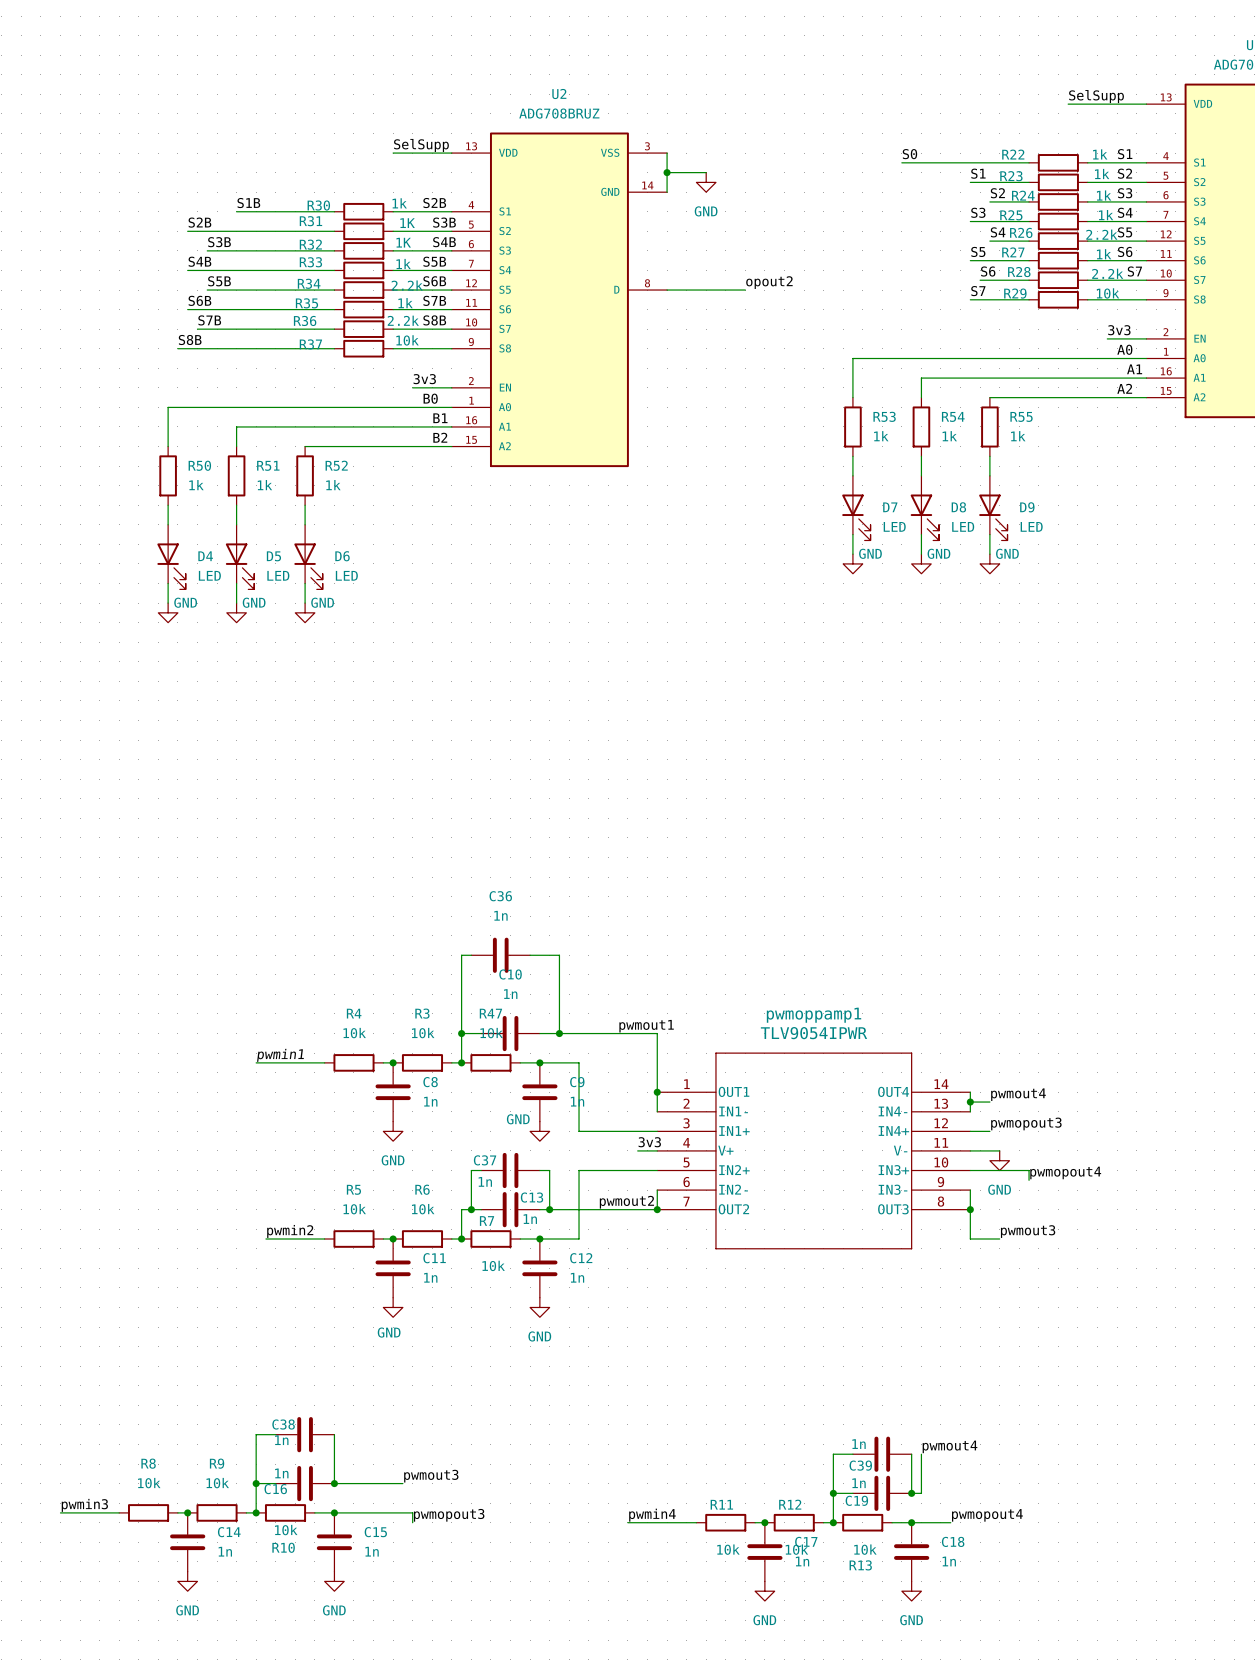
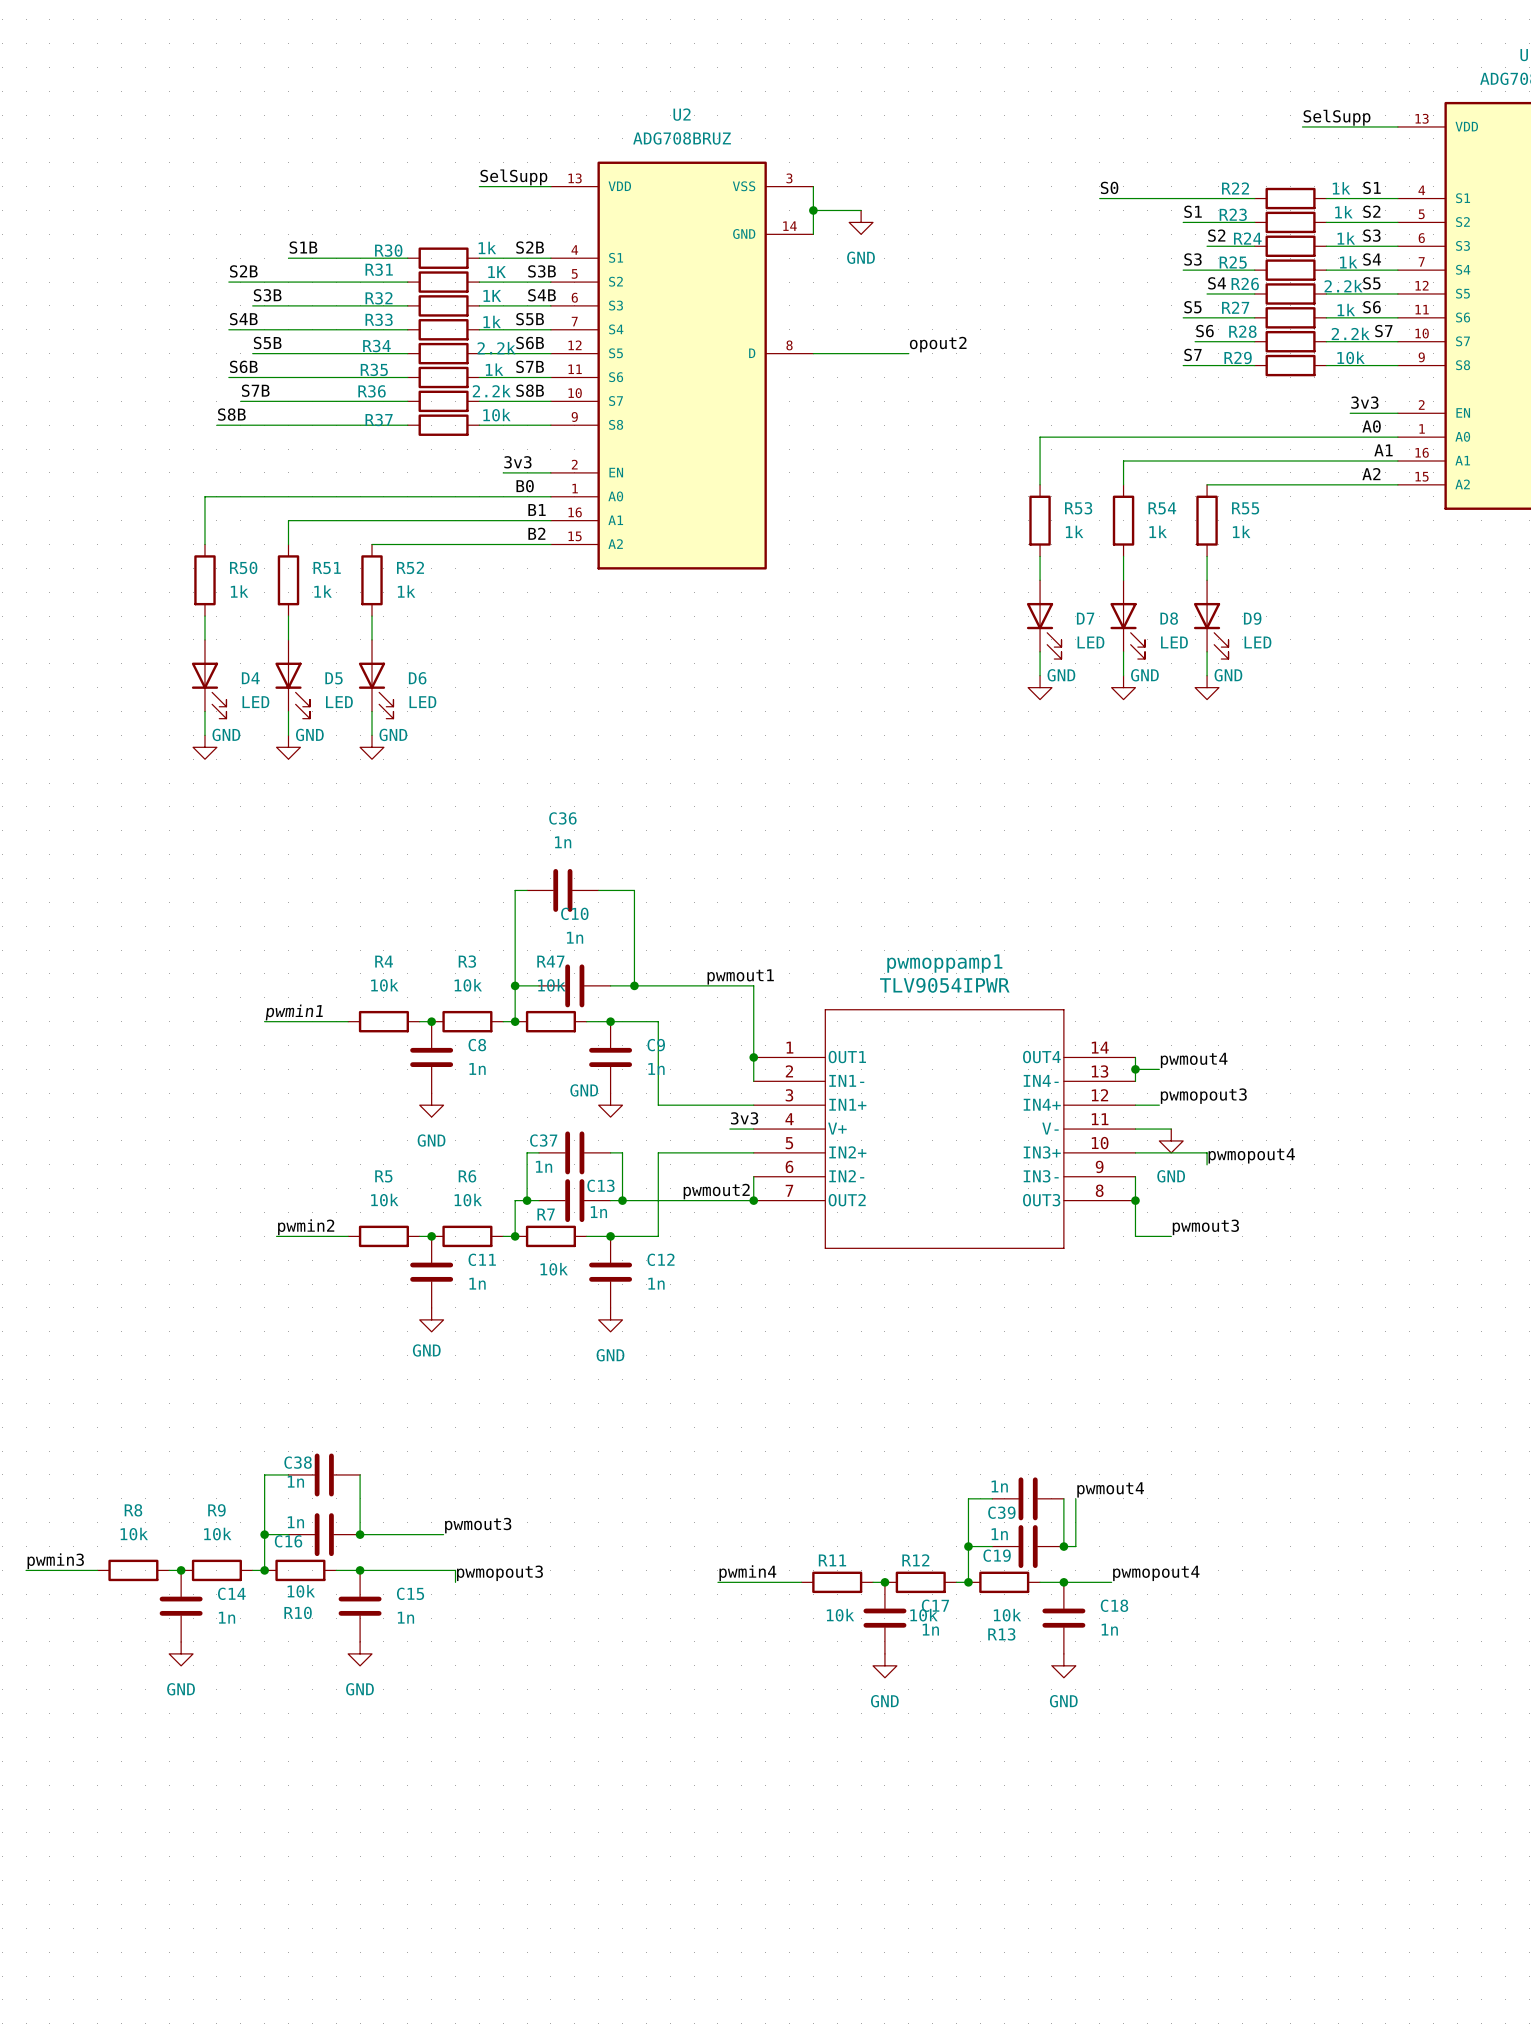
wire: none -> (527, 890) (515, 890) (515, 1021) (503, 1021)
wire: none -> (598, 890) (634, 890) (634, 985)
label: none -> pwmout1 (740, 976)
wire: none -> (515, 985) (539, 985)
junction: none -> (515, 985)
wire: none -> (610, 985) (753, 985) (753, 1081)
junction: none -> (634, 985)
label: none -> pwmin1 (294, 1012)
wire: none -> (264, 1021) (348, 1021)
wire: none -> (419, 1021) (431, 1021)
junction: none -> (431, 1021)
junction: none -> (515, 1021)
wire: none -> (586, 1021) (658, 1021) (658, 1105) (753, 1105)
junction: none -> (610, 1021)
junction: none -> (753, 1057)
wire: none -> (1135, 1057) (1135, 1081)
label: none -> pwmout4 (1194, 1060)
wire: none -> (1135, 1069) (1159, 1069)
junction: none -> (1135, 1069)
label: none -> pwmopout3 (1203, 1096)
power symbol: none -> GND (431, 1105)
power symbol: none -> GND (610, 1105)
wire: none -> (1135, 1105) (1159, 1105)
label: none -> 3v3 (744, 1118)
wire: none -> (1135, 1129) (1171, 1129)
power symbol: none -> GND (1171, 1140)
wire: none -> (539, 1152) (527, 1152) (527, 1200)
wire: none -> (610, 1152) (622, 1152) (622, 1200)
wire: none -> (753, 1152) (658, 1152) (658, 1236) (586, 1236)
wire: none -> (1135, 1152) (1207, 1152) (1207, 1164)
label: none -> pwmopout4 (1251, 1155)
wire: (471, 955) (461, 955) (461, 1062) (451, 1062) -> none
C36 position: (500, 955) -> (562, 890)
wire: (530, 955) (559, 955) (559, 1033) -> none
wire: none -> (753, 1176) (753, 1200) (610, 1200)
wire: none -> (1135, 1176) (1135, 1236) (1171, 1236)
label: none -> pwmout2 (716, 1191)
junction: none -> (527, 1200)
wire: none -> (539, 1200) (515, 1200) (515, 1236) (503, 1236)
junction: none -> (622, 1200)
junction: none -> (753, 1200)
junction: none -> (1135, 1200)
label: none -> pwmin2 (306, 1227)
label: none -> pwmout3 (1205, 1227)
wire: none -> (276, 1236) (348, 1236)
junction: none -> (431, 1236)
junction: none -> (515, 1236)
junction: none -> (610, 1236)
label: pwmout1 (646, 1026) -> none
wire: (461, 1033) (481, 1033) -> (729, 1129) (753, 1129)
junction: (461, 1033) -> none
C10 position: (510, 1033) -> (574, 985)
wire: (539, 1033) (657, 1033) (657, 1111) -> none
junction: (559, 1033) -> none
label: pwmin1 (280, 1055) -> none
wire: (256, 1062) (324, 1062) -> none
R4 position: (353, 1062) -> (383, 1021)
wire: (383, 1062) (393, 1062) -> (419, 1236) (431, 1236)
junction: (393, 1062) -> none
R3 position: (422, 1062) -> (467, 1021)
junction: (461, 1062) -> none
R47 position: (490, 1062) -> (550, 1021)
wire: (520, 1062) (579, 1062) (579, 1131) (657, 1131) -> none
junction: (539, 1062) -> none
power symbol: none -> GND (431, 1319)
power symbol: none -> GND (610, 1319)
C8 position: (393, 1092) -> (431, 1057)
C9 position: (539, 1092) -> (610, 1057)
junction: (657, 1092) -> none
wire: (970, 1092) (970, 1111) -> none
label: pwmout4 (1018, 1094) -> none
wire: (970, 1102) (989, 1102) -> none
junction: (970, 1102) -> none
label: pwmopout3 (1026, 1123) -> none
power symbol: GND (393, 1131) -> none
power symbol: GND (539, 1131) -> none
wire: (970, 1131) (989, 1131) -> none
label: 3v3 (649, 1142) -> none
wire: (637, 1150) (657, 1150) -> none
pwmoppamp1 position: (813, 1150) -> (944, 1129)
wire: (970, 1150) (999, 1150) -> none
power symbol: GND (999, 1160) -> none
wire: (481, 1170) (471, 1170) (471, 1209) -> none
C37 position: (510, 1170) -> (574, 1152)
wire: (539, 1170) (549, 1170) (549, 1209) -> none
wire: (657, 1170) (579, 1170) (579, 1238) (520, 1238) -> none
wire: (970, 1170) (1029, 1170) (1029, 1180) -> none
label: pwmopout4 (1065, 1172) -> none
wire: (657, 1190) (657, 1209) (539, 1209) -> none
wire: (970, 1190) (970, 1238) (999, 1238) -> none
label: pwmout2 (626, 1202) -> none
wire: none -> (288, 1474) (264, 1474) (264, 1570) (252, 1570)
wire: none -> (360, 1474) (360, 1534) (443, 1534)
junction: (471, 1209) -> none
wire: (481, 1209) (461, 1209) (461, 1238) (451, 1238) -> none
C13 position: (510, 1209) -> (574, 1200)
junction: (549, 1209) -> none
junction: (657, 1209) -> none
junction: (970, 1209) -> none
label: none -> pwmout4 (1110, 1489)
wire: none -> (992, 1498) (968, 1498) (968, 1582) (956, 1582)
wire: none -> (1063, 1498) (1063, 1546) (1075, 1546) (1075, 1498)
label: pwmin2 (290, 1231) -> none
label: pwmout3 (1028, 1231) -> none
wire: (265, 1238) (324, 1238) -> none
R5 position: (353, 1238) -> (383, 1236)
wire: (383, 1238) (393, 1238) -> none
junction: (393, 1238) -> none
R6 position: (422, 1238) -> (467, 1236)
junction: (461, 1238) -> none
R7 position: (490, 1238) -> (550, 1236)
junction: (539, 1238) -> none
label: none -> pwmout3 (478, 1525)
wire: none -> (264, 1534) (288, 1534)
junction: none -> (264, 1534)
junction: none -> (360, 1534)
C11 position: (393, 1268) -> (431, 1272)
C12 position: (539, 1268) -> (610, 1272)
wire: none -> (968, 1546) (992, 1546)
junction: none -> (968, 1546)
junction: none -> (1063, 1546)
label: none -> pwmin3 (55, 1561)
wire: none -> (26, 1570) (97, 1570)
wire: none -> (169, 1570) (181, 1570)
junction: none -> (181, 1570)
junction: none -> (264, 1570)
wire: none -> (336, 1570) (455, 1570) (455, 1582)
junction: none -> (360, 1570)
label: none -> pwmopout3 (499, 1573)
label: none -> pwmin4 (747, 1573)
label: none -> pwmopout4 (1156, 1573)
wire: none -> (717, 1582) (801, 1582)
wire: none -> (873, 1582) (884, 1582)
junction: none -> (884, 1582)
junction: none -> (968, 1582)
wire: none -> (1040, 1582) (1111, 1582)
junction: none -> (1063, 1582)
power symbol position: GND (393, 1307) -> GND (360, 1653)
power symbol: GND (539, 1307) -> none
power symbol text position: GND (389, 1332) -> GND (359, 1689)
power symbol: none -> GND (181, 1653)
power symbol: none -> GND (884, 1665)
power symbol: none -> GND (1063, 1665)
wire: (275, 1434) (256, 1434) (256, 1512) (246, 1512) -> none
C38 position: (305, 1434) -> (324, 1474)
wire: (334, 1434) (334, 1483) (402, 1483) -> none
label: pwmout4 (950, 1446) -> none
wire: (852, 1454) (833, 1454) (833, 1522) (823, 1522) -> none
C39 position: (882, 1454) -> (1028, 1498)
wire: (911, 1454) (911, 1493) (921, 1493) (921, 1454) -> none
label: pwmout3 (431, 1476) -> none
wire: (256, 1483) (275, 1483) -> none
junction: (256, 1483) -> none
C16 position: (305, 1483) -> (324, 1534)
junction: (334, 1483) -> none
wire: (833, 1493) (852, 1493) -> none
junction: (833, 1493) -> none
C19 position: (882, 1493) -> (1028, 1546)
junction: (911, 1493) -> none
label: pwmin3 (84, 1505) -> none
wire: (60, 1512) (119, 1512) -> none
R8 position: (148, 1512) -> (133, 1570)
wire: (177, 1512) (187, 1512) -> none
junction: (187, 1512) -> none
R9 position: (217, 1512) -> (216, 1570)
junction: (256, 1512) -> none
R10 position: (285, 1512) -> (300, 1570)
wire: (314, 1512) (412, 1512) (412, 1522) -> none
junction: (334, 1512) -> none
label: pwmopout3 (449, 1515) -> none
label: pwmin4 (652, 1515) -> none
label: pwmopout4 (987, 1515) -> none
wire: (627, 1522) (696, 1522) -> none
R11 position: (725, 1522) -> (837, 1582)
wire: (755, 1522) (764, 1522) -> none
junction: (764, 1522) -> none
R12 position: (794, 1522) -> (920, 1582)
junction: (833, 1522) -> none
R13 position: (862, 1522) -> (1004, 1582)
wire: (892, 1522) (950, 1522) -> none
junction: (911, 1522) -> none
C14 position: (187, 1542) -> (181, 1606)
C15 position: (334, 1542) -> (360, 1606)
C17 position: (764, 1552) -> (884, 1618)
C18 position: (911, 1552) -> (1063, 1618)
power symbol: GND (187, 1581) -> none
power symbol: GND (334, 1581) -> none
power symbol: GND (764, 1591) -> none
power symbol: GND (911, 1591) -> none

